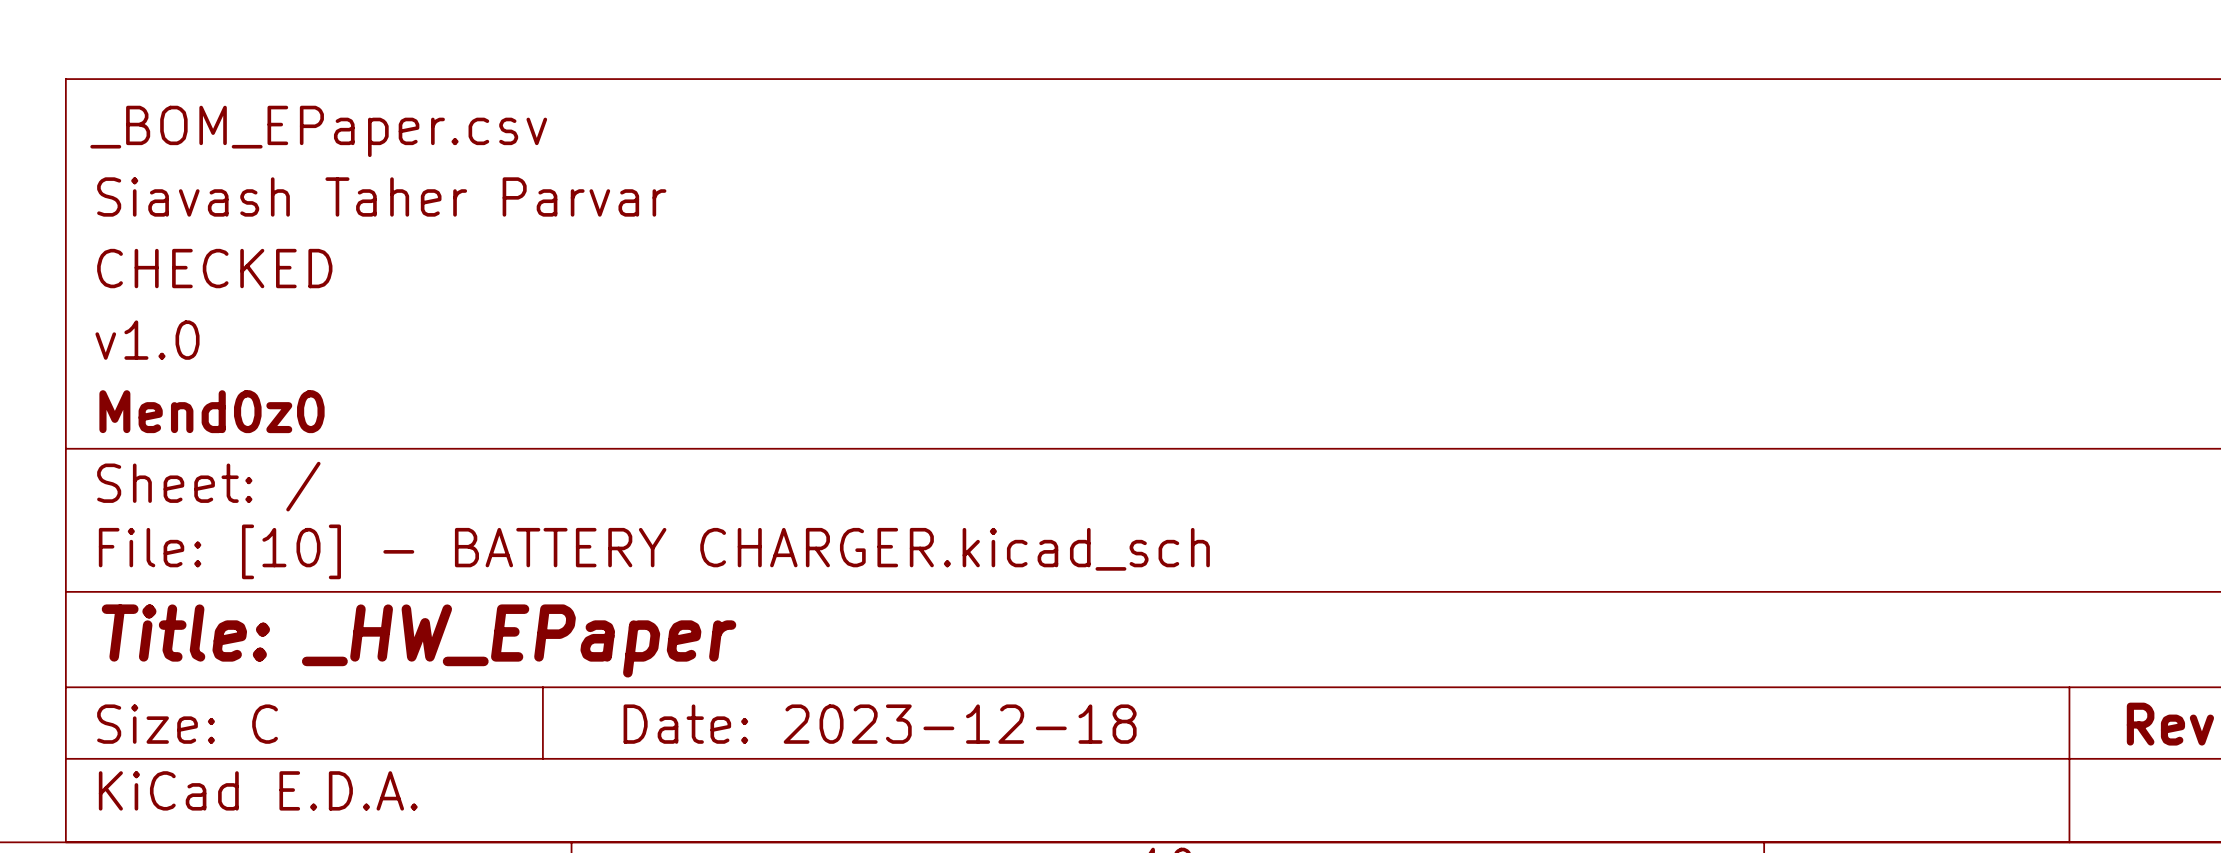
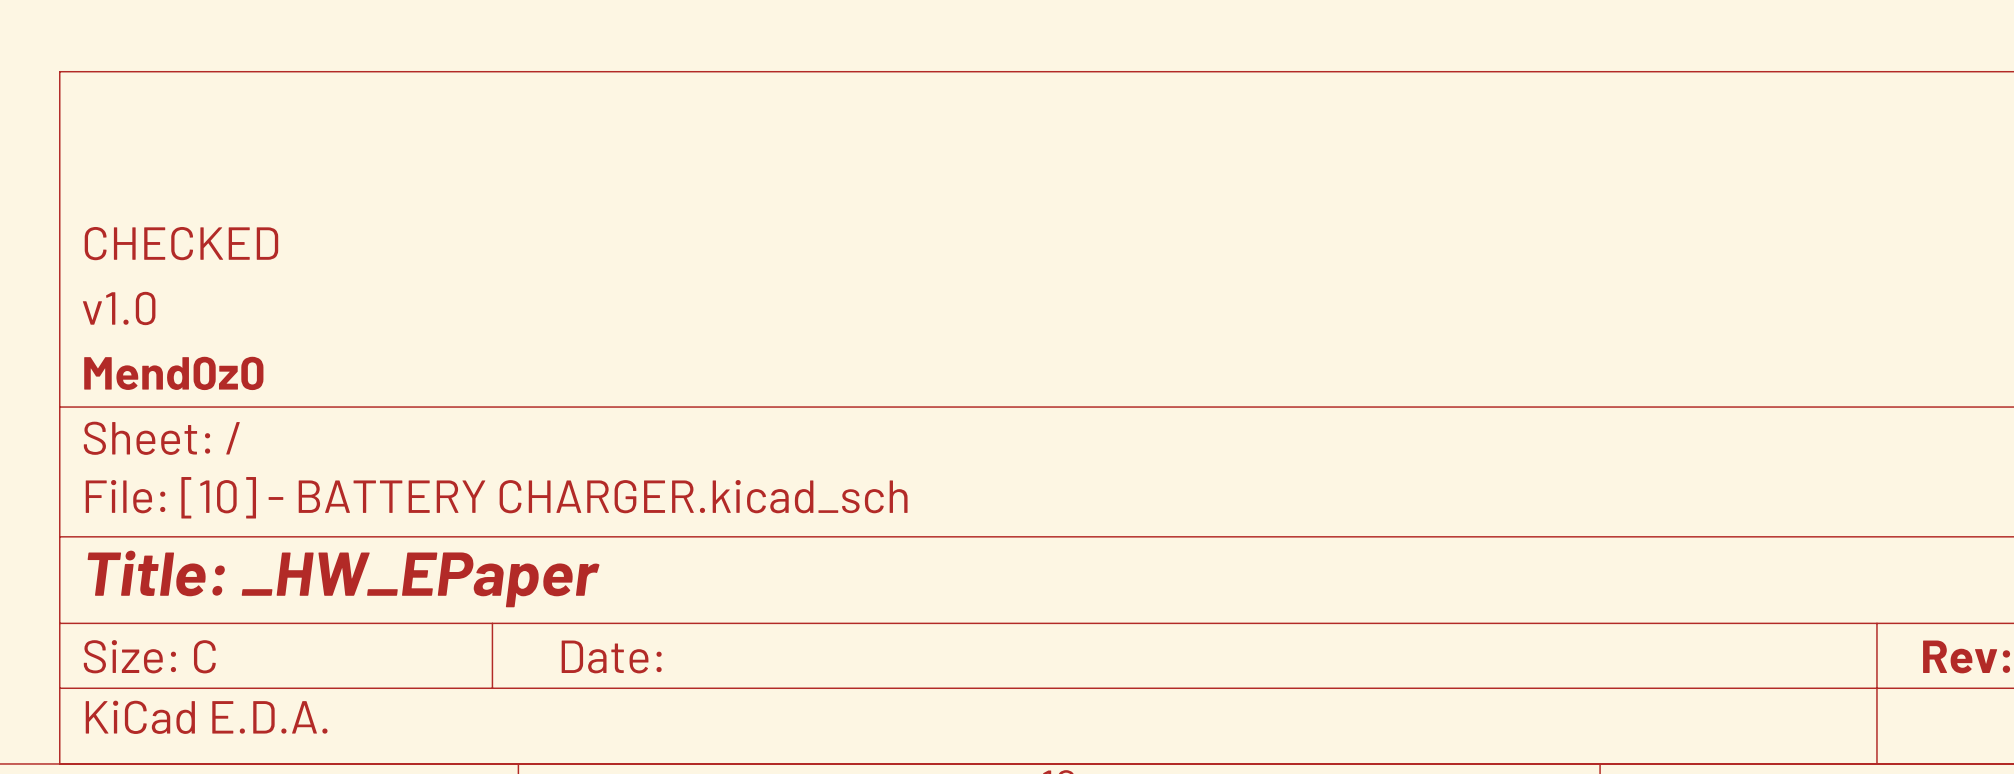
title block: _BOM_EPaper.csv (318, 131) -> none
title block: Siavash Taher Parvar (381, 196) -> none
title block: Date: 2023-12-18 (880, 724) -> Date: (611, 656)

